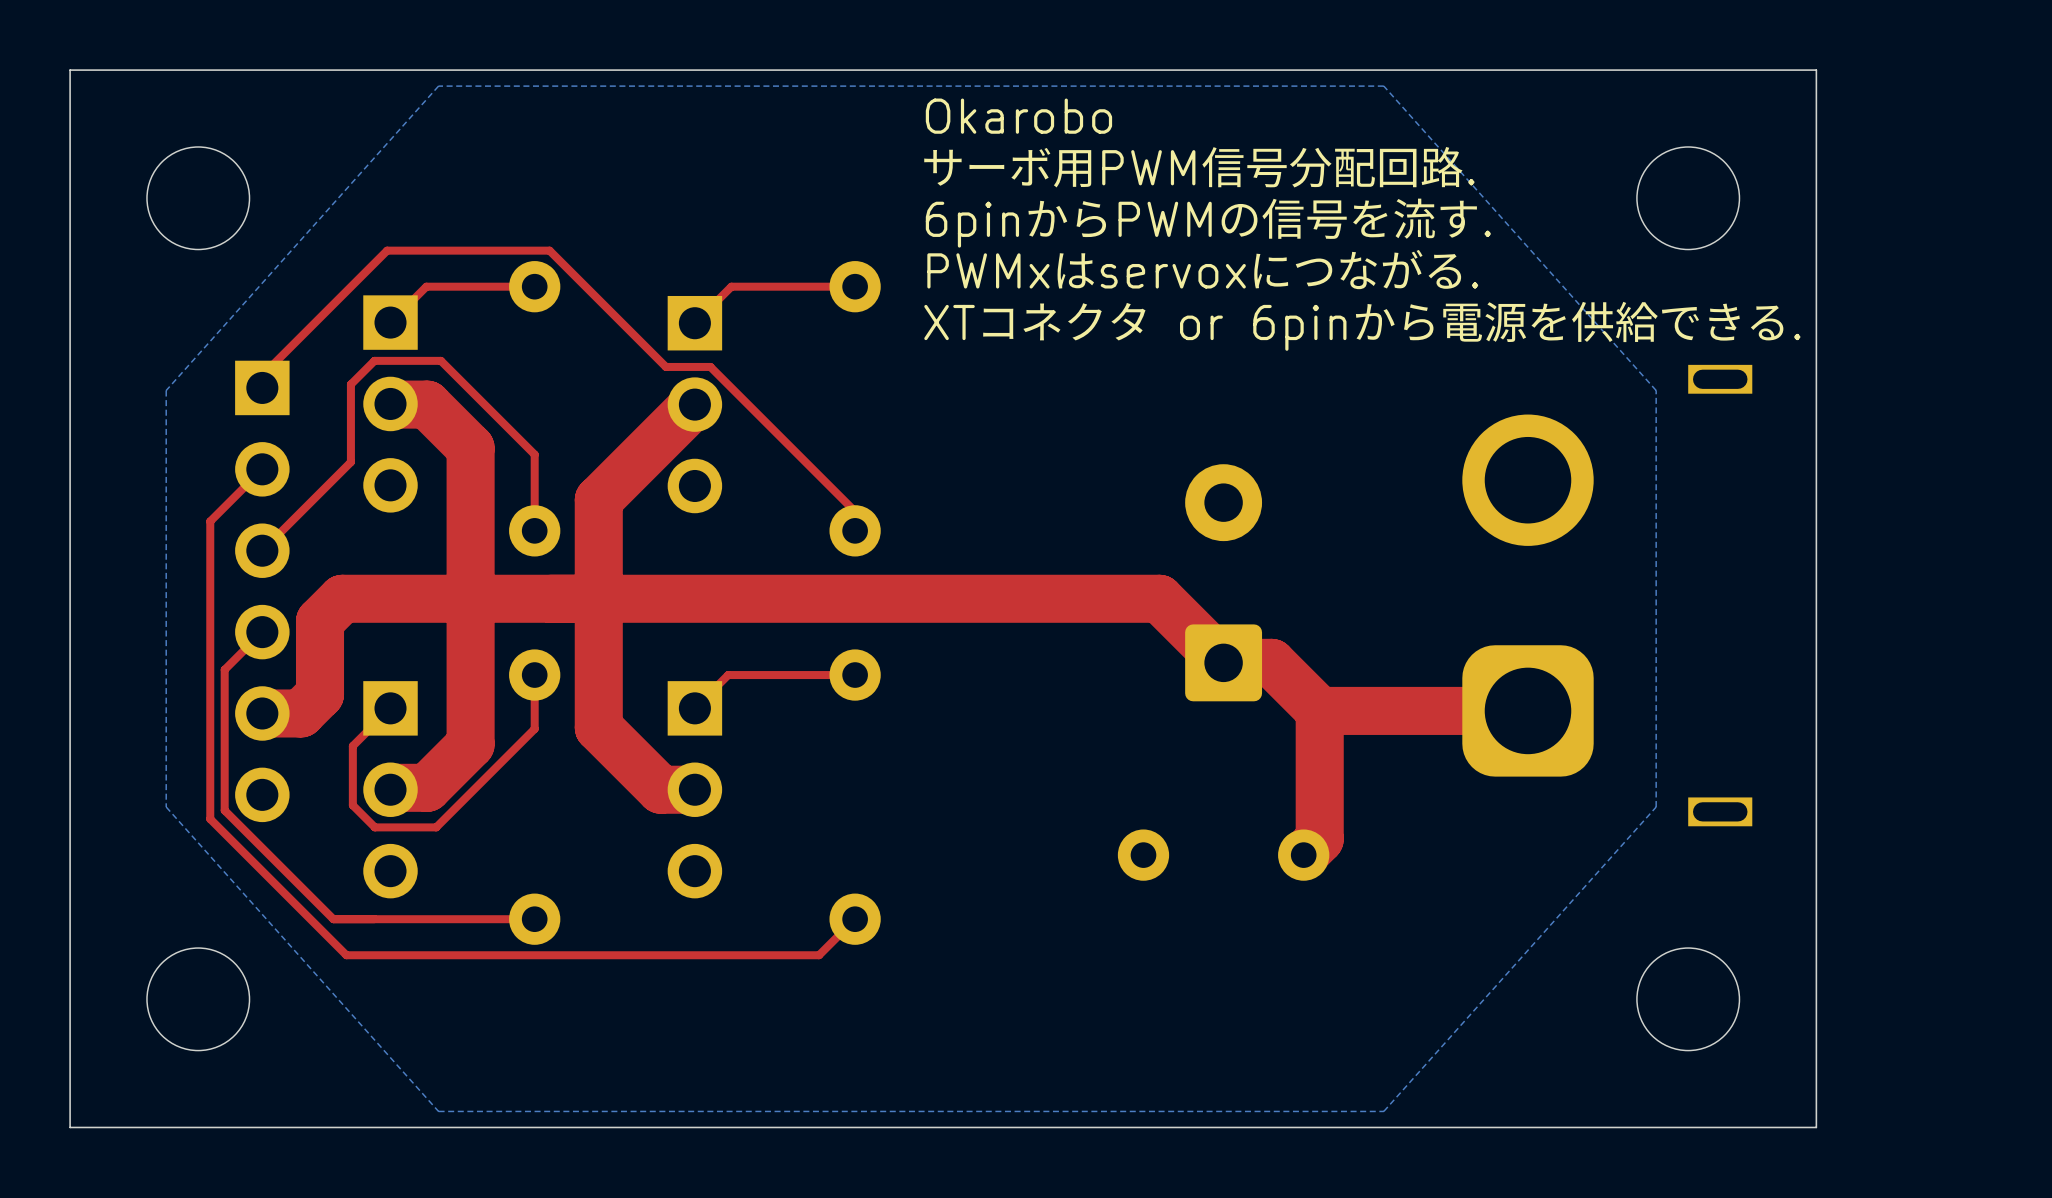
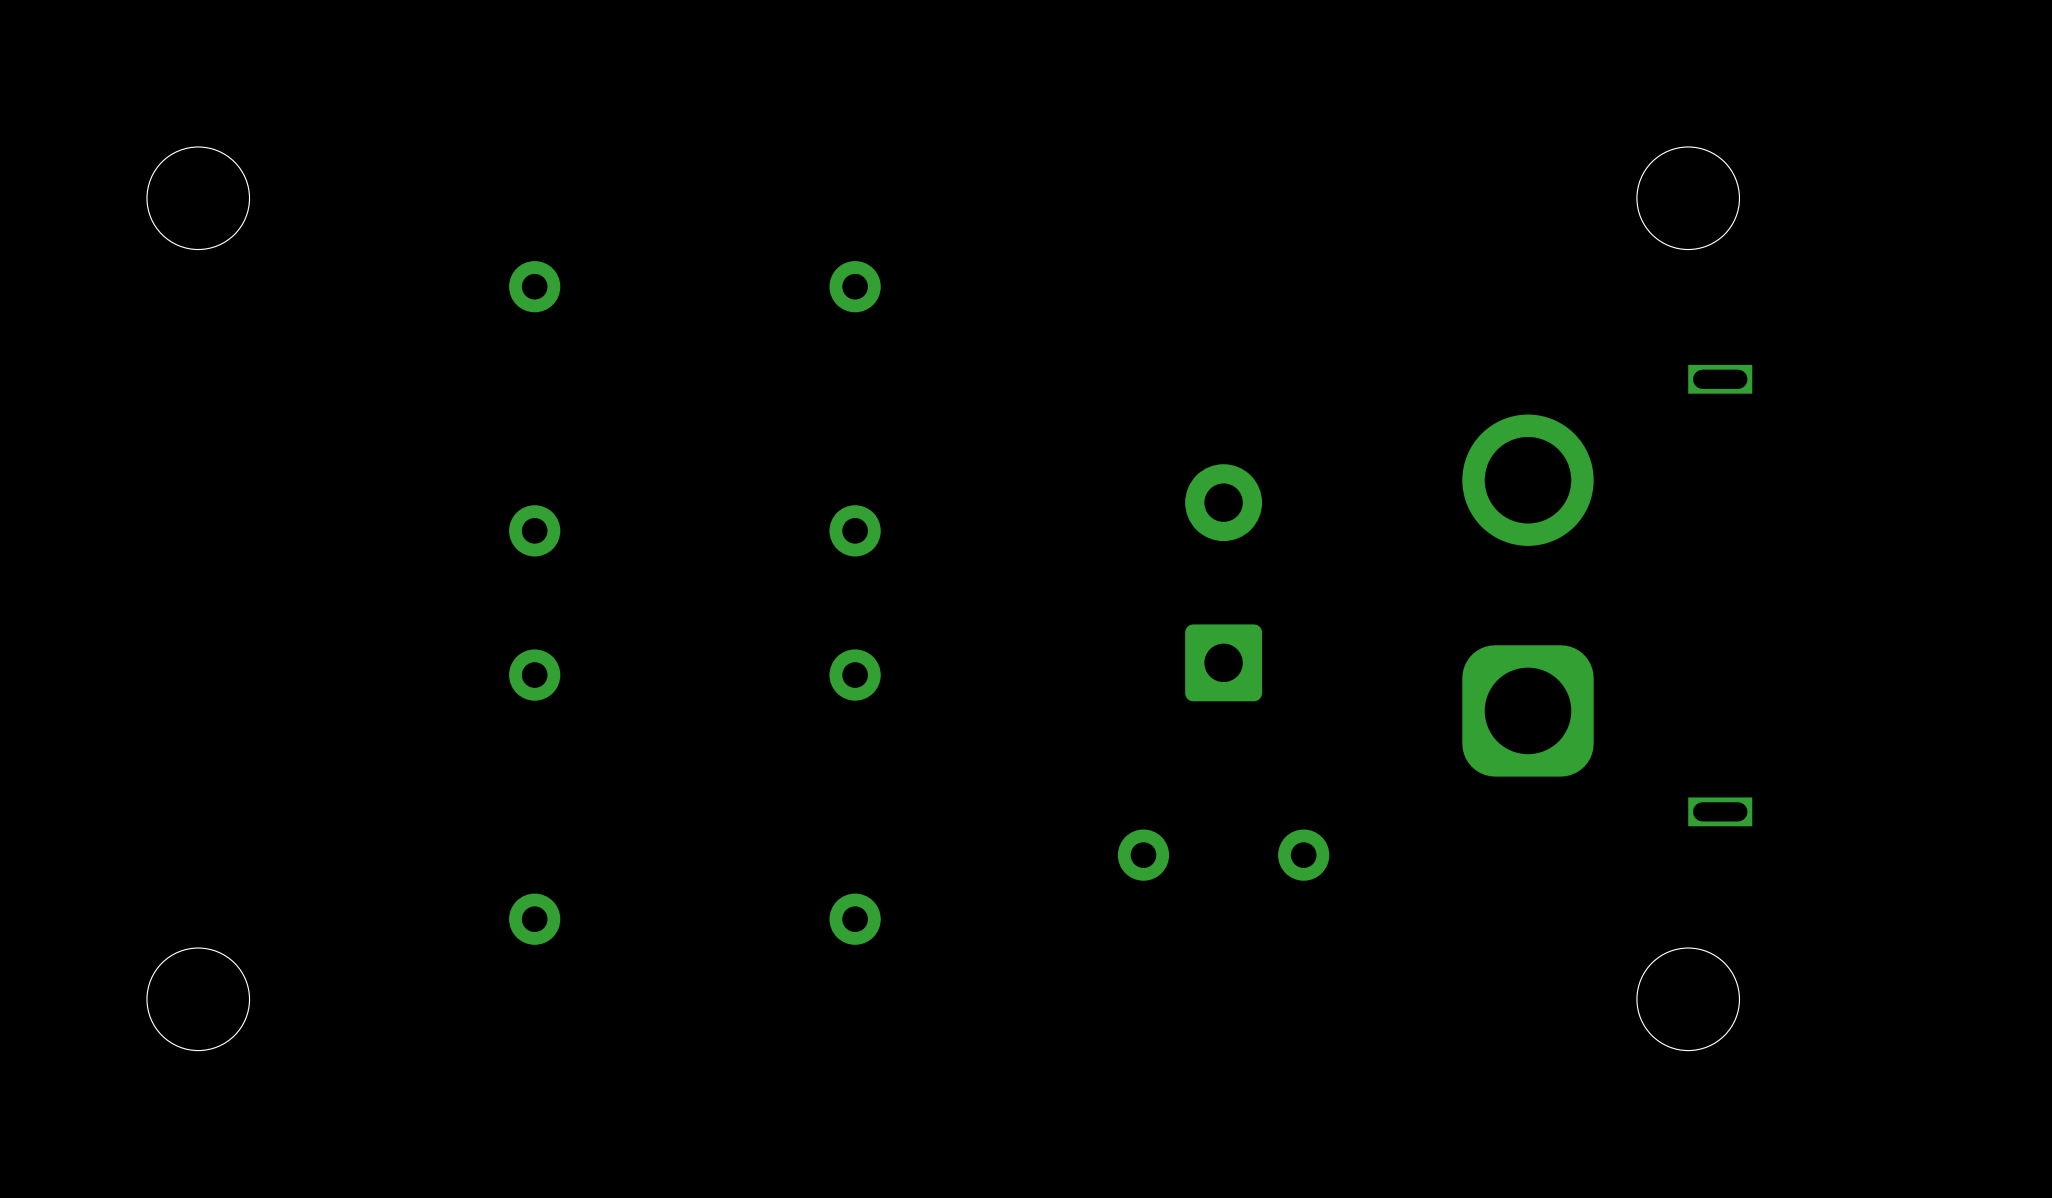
board edge: (1816, 70) (70, 70) (70, 1127) (1816, 1127) (1816, 70) -> none
bottom zone outline: (1383, 86) (1656, 390) (1656, 807) (1383, 1111) (438, 1111) (166, 807) (166, 390) (438, 86) (1383, 86) -> none
text: Okarobo (1018, 116) -> none
text: サーボ用PWM信号分配回路. (1198, 167) -> none
text: 6pinからPWMの信号を流す. (1208, 222) -> none
text: PWMxはservoxにつながる. (1202, 269) -> none
top track: (534, 286) (426, 286) (390, 322) -> none
top track: (855, 286) (731, 286) (694, 323) -> none
text: XTコネクタ or 6pinから電源を供給できる. (1362, 325) -> none
top track: (262, 387) (262, 375) (387, 250) (549, 250) (665, 366) (710, 366) (855, 511) (855, 530) -> none
part: (390, 403) -> none
top track: (694, 403) (598, 499) (598, 727) (660, 789) (694, 789) -> none
top track: (388, 404) (427, 404) (470, 448) (470, 744) (427, 787) (388, 787) -> none
part: (694, 404) -> none
top track: (262, 469) (210, 521) (210, 819) (346, 955) (819, 955) (855, 919) -> none
top track: (534, 530) (534, 454) (440, 360) (374, 360) (350, 384) (350, 462) (262, 550) -> none
part: (262, 591) -> none
top track: (262, 632) (224, 669) (224, 810) (333, 919) (534, 919) -> none
top track: (534, 675) (534, 728) (436, 827) (374, 827) (352, 805) (352, 746) (390, 708) -> none
top track: (855, 675) (728, 675) (694, 708) -> none
top track: (1319, 710) (1271, 662) (1223, 662) (1159, 598) (342, 598) (320, 621) (320, 694) (300, 713) (262, 713) -> none
top track: (1319, 710) (1319, 839) (1303, 855) -> none
top track: (1527, 710) (1319, 710) -> none
part: (390, 789) -> none
part: (694, 789) -> none

